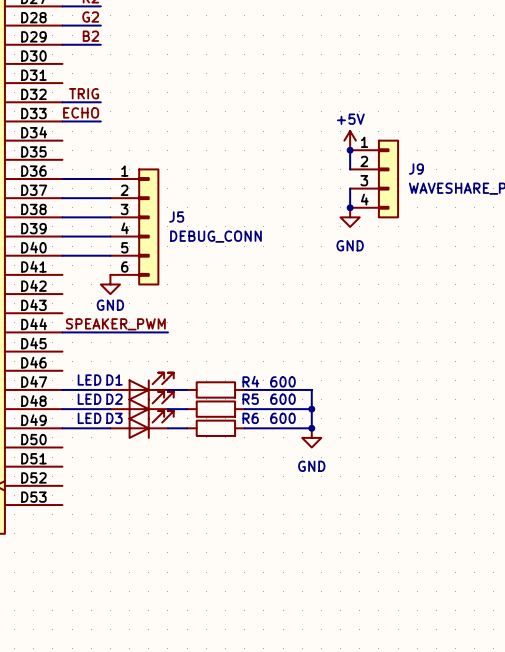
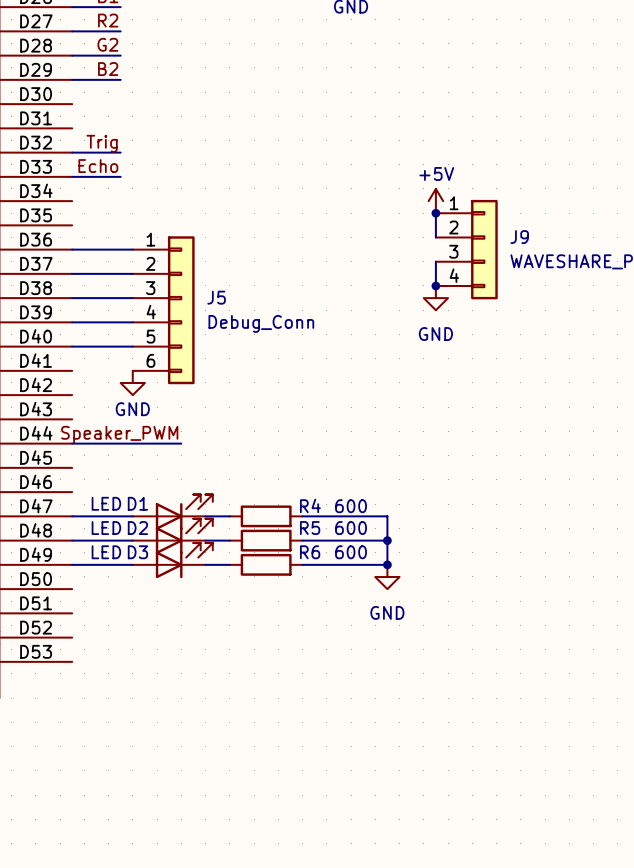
label: TRIG (84, 93) -> Trig (102, 143)
label: ECHO (81, 112) -> Echo (98, 166)
J5 value: DEBUG_CONN (215, 236) -> Debug_Conn (261, 323)
label: SPEAKER_PWM (115, 324) -> none
label: none -> Speaker_PWM (119, 434)
wire: (148, 332) (167, 332) -> none

